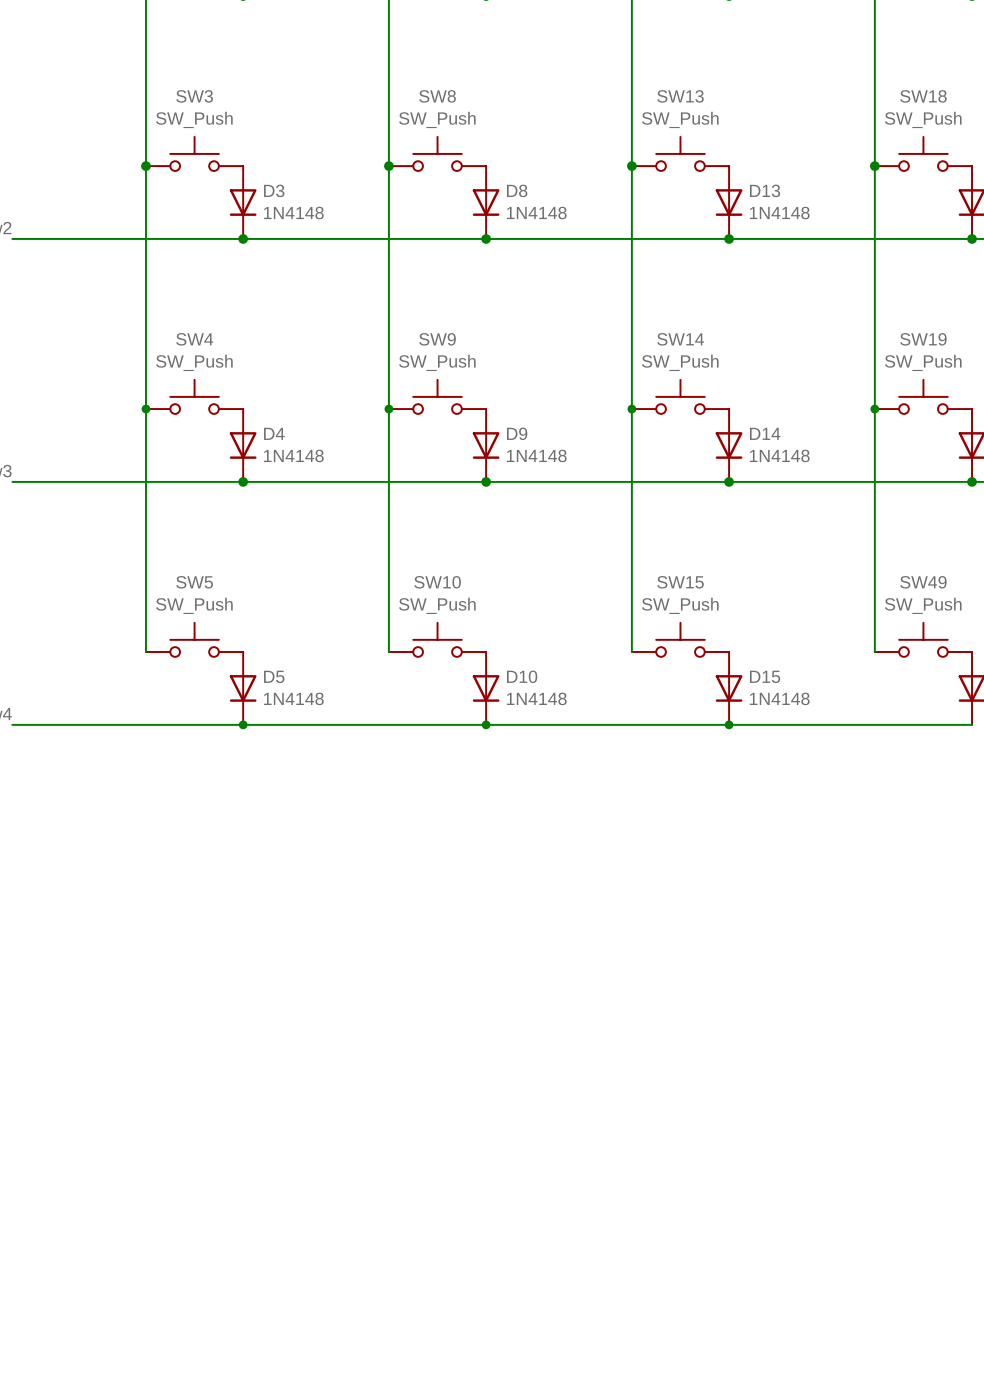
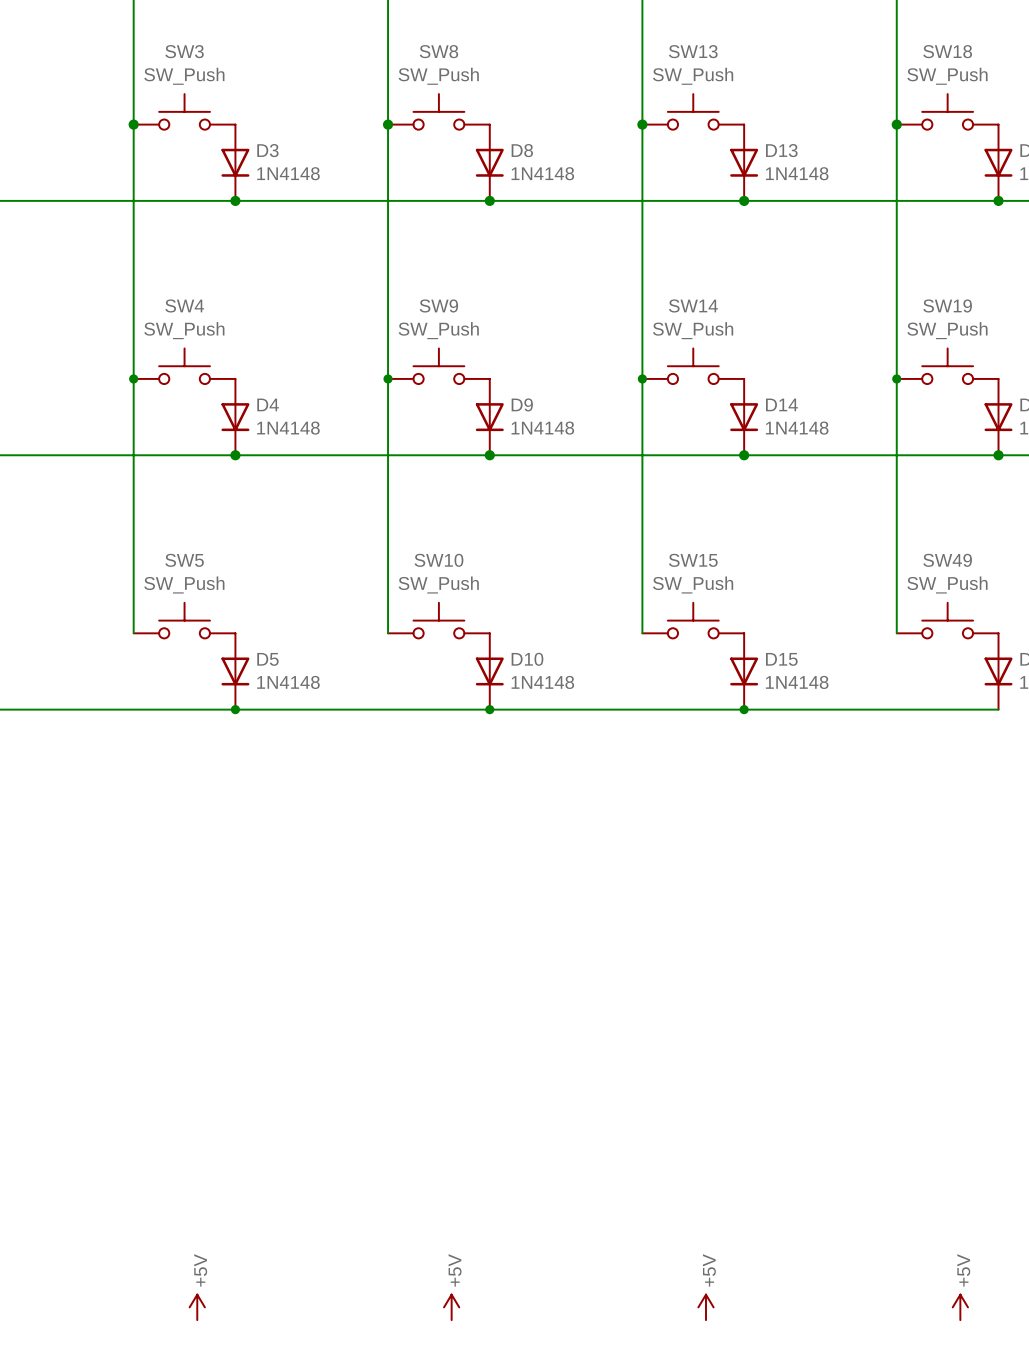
power symbol: none -> +5V (197, 1307)
power symbol: none -> +5V (451, 1307)
power symbol: none -> +5V (705, 1307)
power symbol: none -> +5V (960, 1307)

